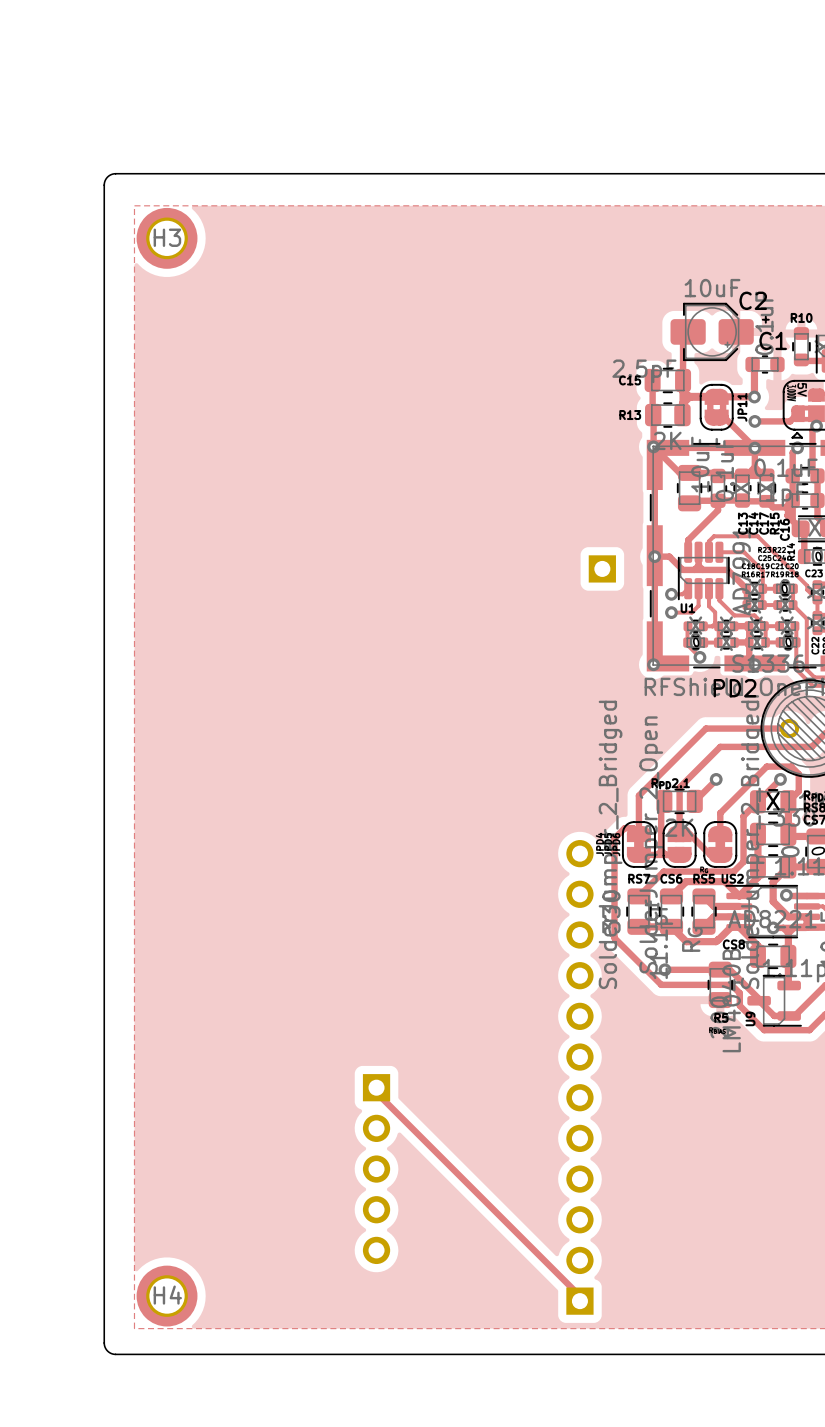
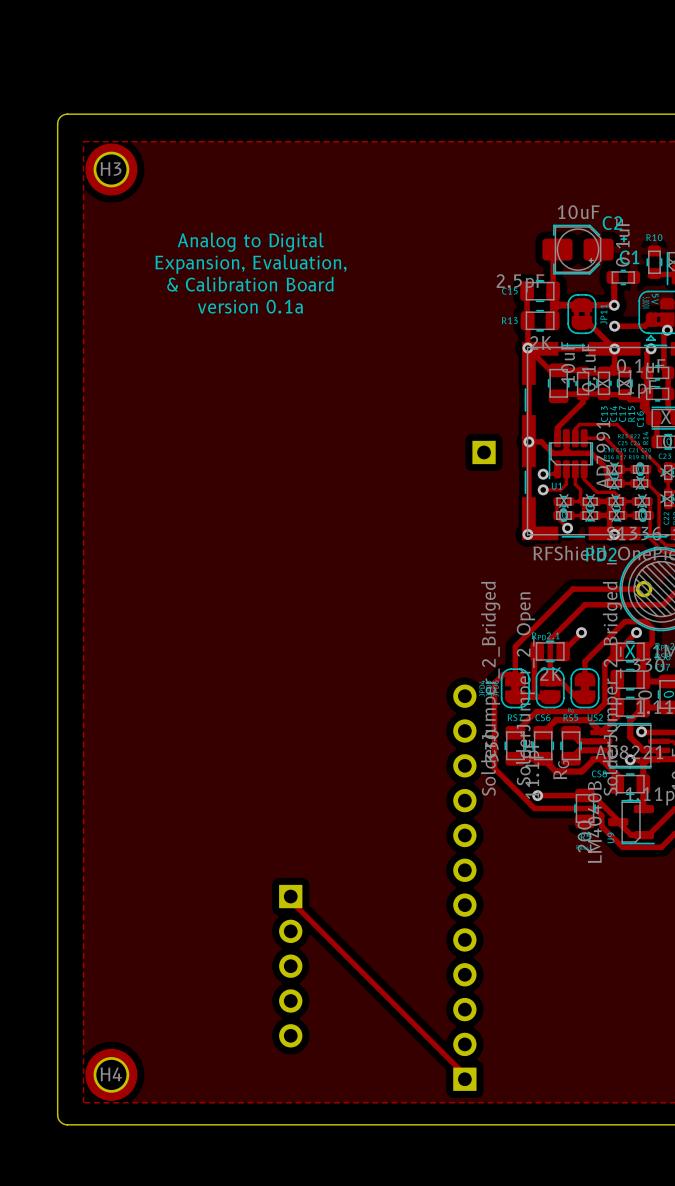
text: none -> Analog to Digital (250, 242)
text: none -> Expansion, Evaluation, (250, 264)
text: none -> & Calibration Board (250, 284)
text: none -> version 0.1a (250, 306)

